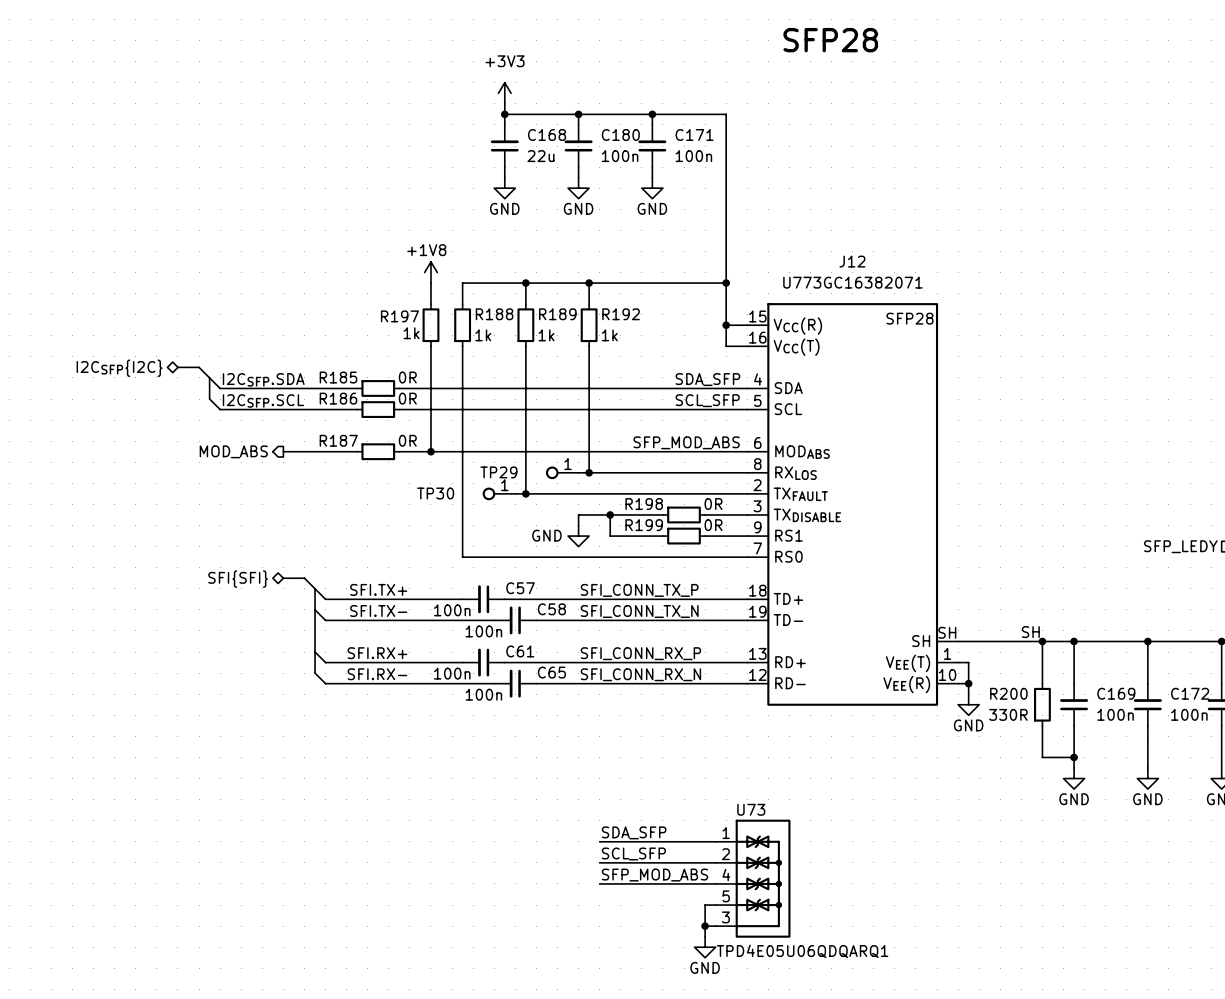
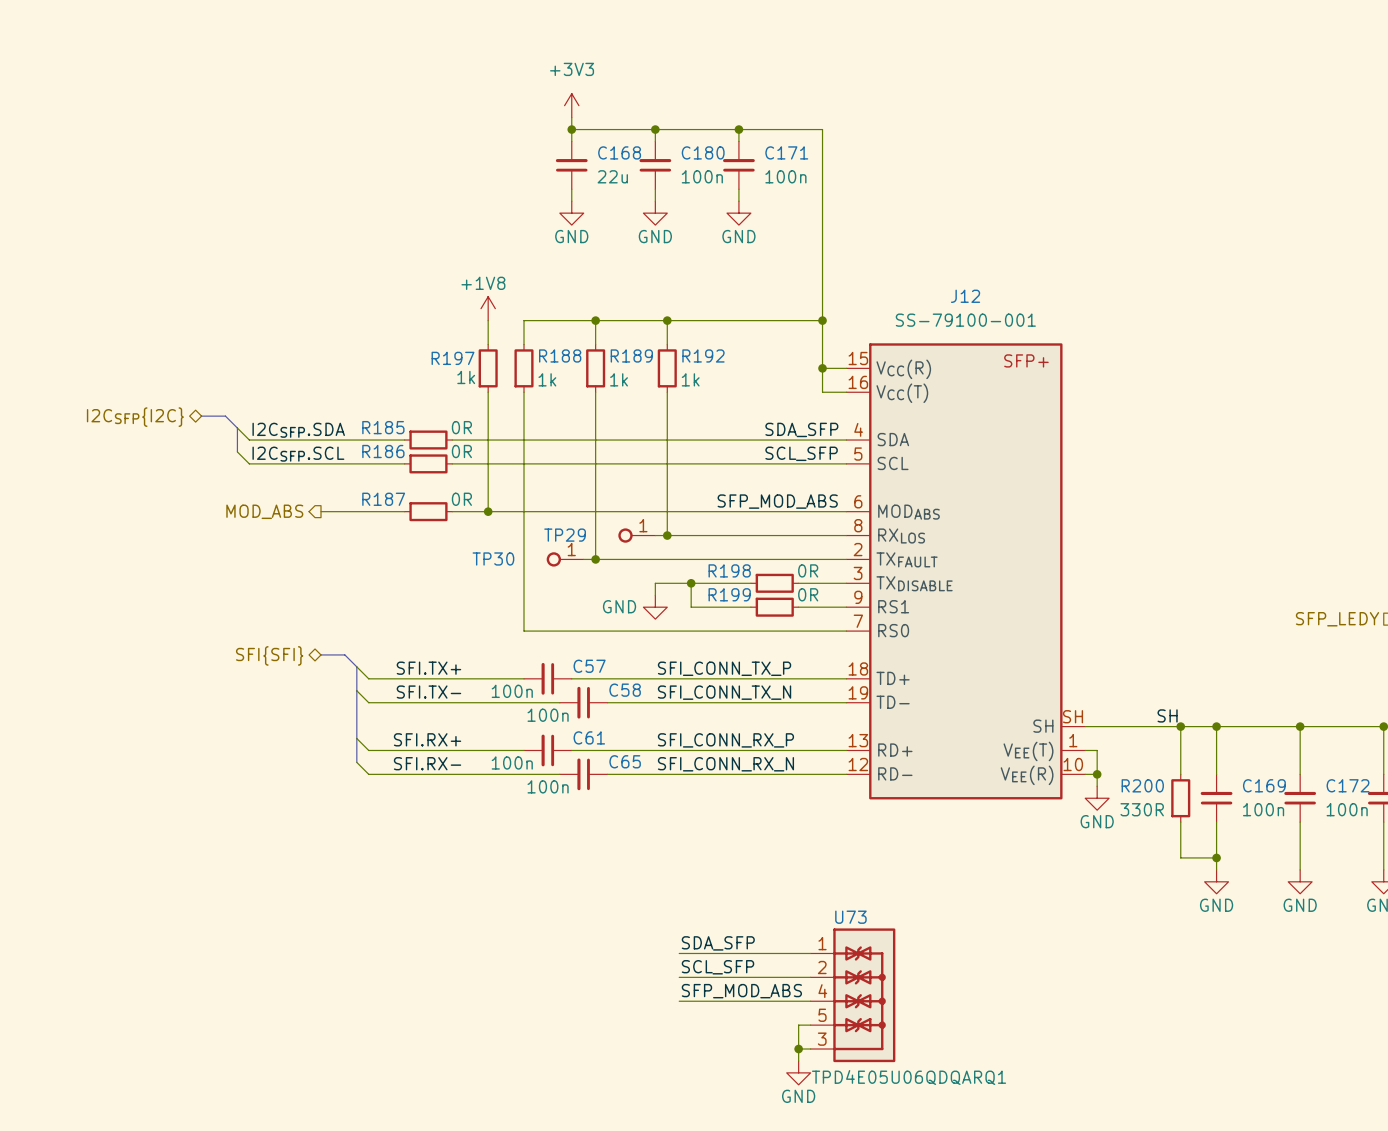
text: SFP28 (830, 40) -> none
J12 text: U773GC16382071 (852, 282) -> SS-79100-001 (965, 320)
J12 text: SFP28 (909, 318) -> SFP+ (1026, 360)

